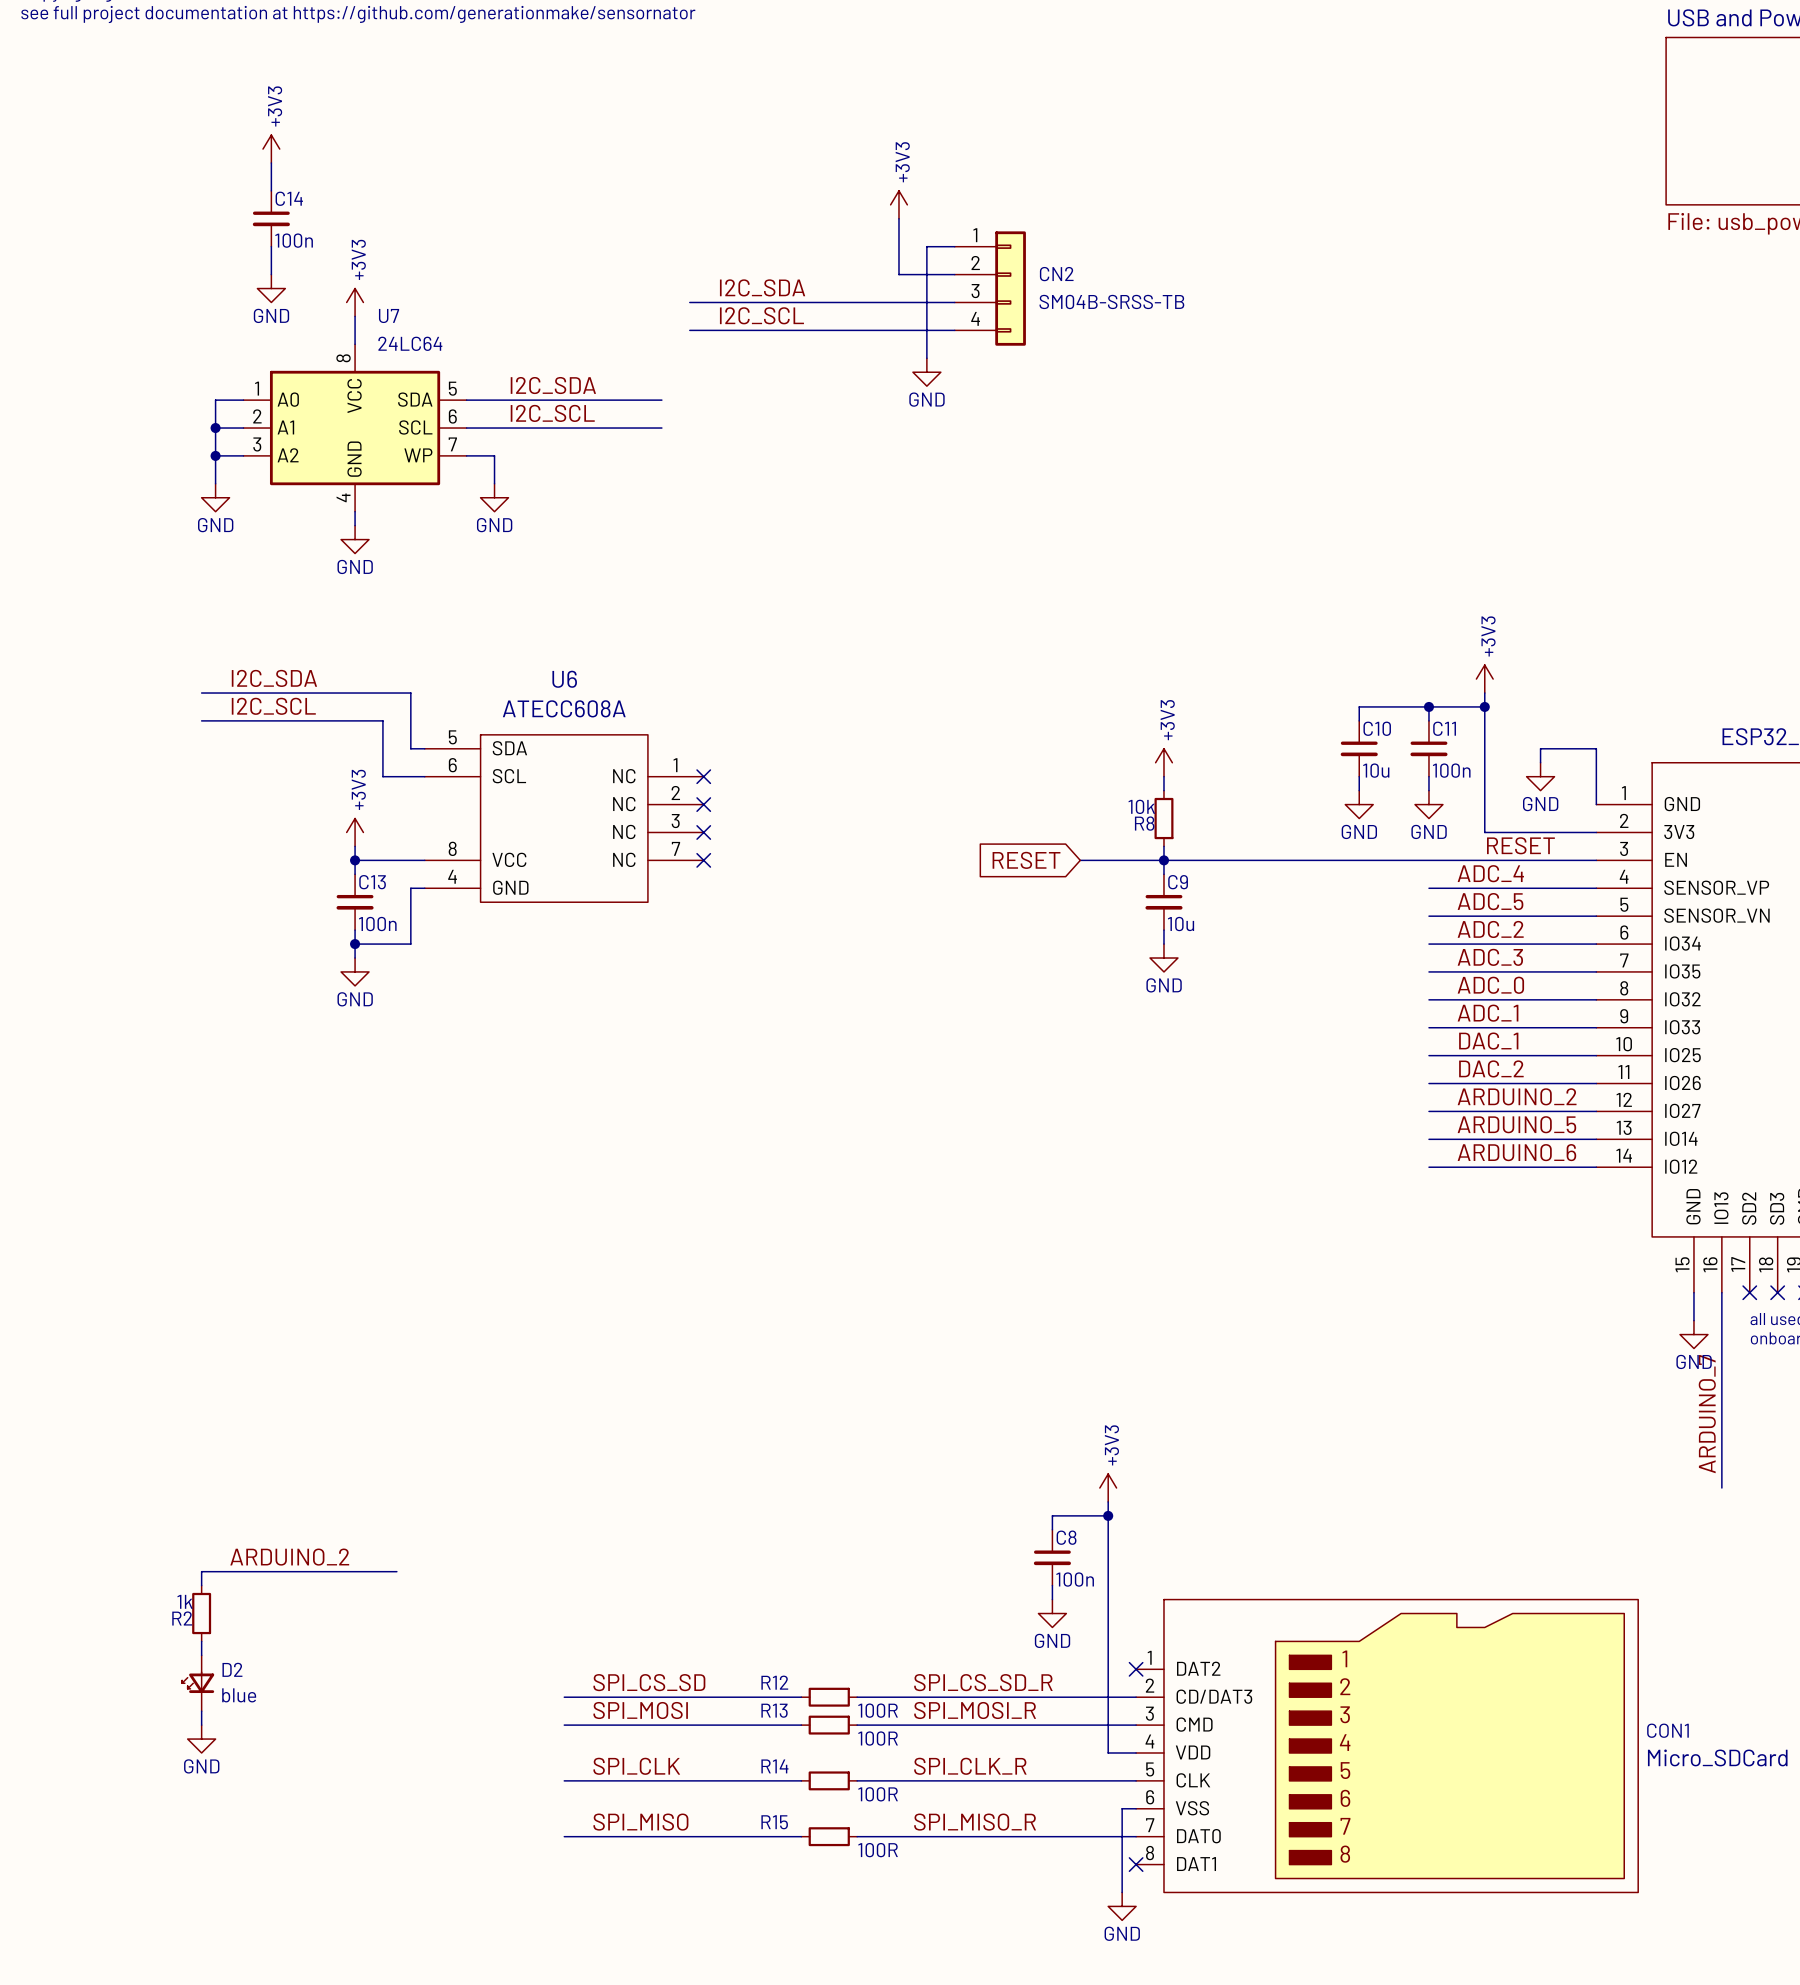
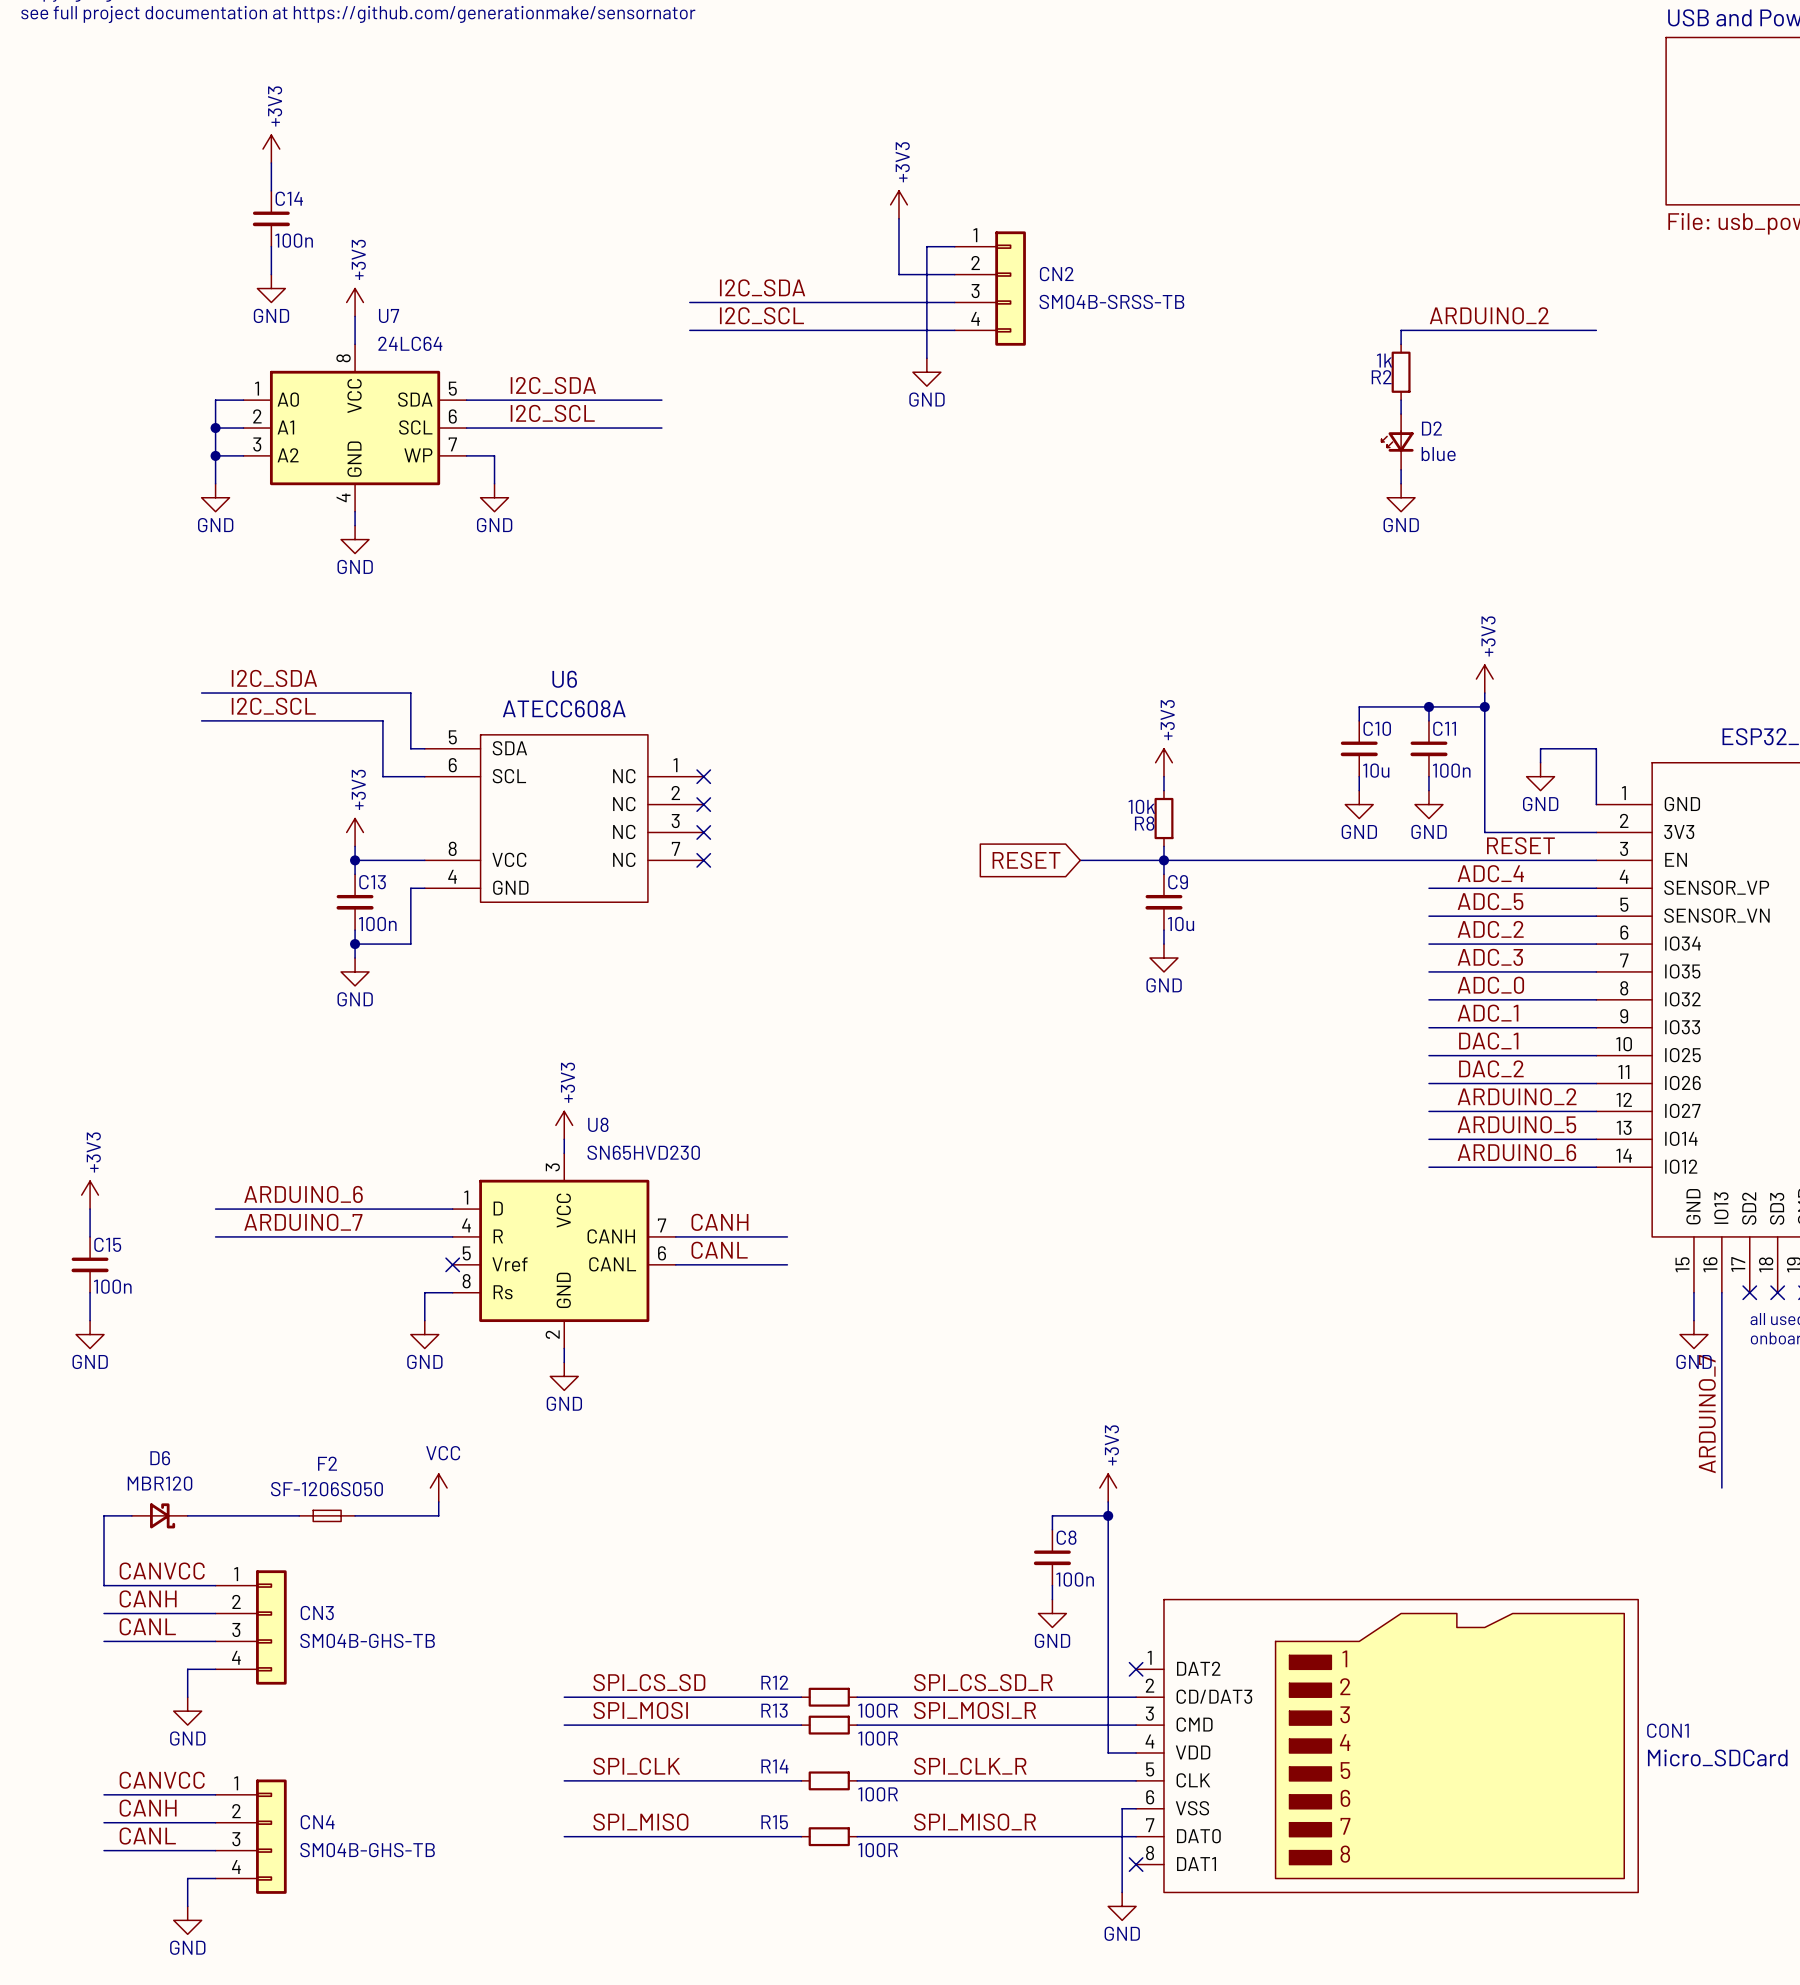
label: none -> ARDUINO_2 (1489, 315)
wire: none -> (1596, 330) (1401, 330) (1401, 344)
wire: none -> (1401, 400) (1401, 414)
wire: none -> (1401, 469) (1401, 483)
power symbol: none -> GND (1401, 497)
power symbol: none -> +3V3 (564, 1125)
wire: none -> (564, 1139) (564, 1153)
label: none -> ARDUINO_6 (303, 1194)
power symbol: none -> +3V3 (90, 1195)
wire: none -> (90, 1209) (90, 1236)
wire: none -> (215, 1209) (452, 1209)
label: none -> ARDUINO_7 (303, 1222)
label: none -> CANH (719, 1222)
wire: none -> (215, 1236) (452, 1236)
wire: none -> (675, 1236) (787, 1236)
U8: none -> SN65HVD230 (564, 1250)
label: none -> CANL (719, 1250)
C15: none -> 100n (90, 1264)
no-connect mark: none -> (452, 1264)
wire: none -> (675, 1264) (787, 1264)
wire: none -> (90, 1292) (90, 1320)
wire: none -> (452, 1292) (424, 1292) (424, 1320)
power symbol: none -> GND (90, 1334)
power symbol: none -> GND (424, 1334)
wire: none -> (564, 1348) (564, 1362)
power symbol: none -> GND (564, 1376)
power symbol: none -> VCC (438, 1488)
wire: none -> (438, 1501) (438, 1515) (355, 1515)
wire: none -> (131, 1515) (104, 1515) (104, 1585) (215, 1585)
D6: none -> MBR120 (159, 1515)
wire: none -> (187, 1515) (299, 1515)
F2: none -> SF-1206S050 (327, 1515)
label: ARDUINO_2 (289, 1557) -> none
label: none -> CANVCC (162, 1571)
wire: (396, 1571) (201, 1571) (201, 1585) -> none
label: none -> CANH (148, 1598)
wire: none -> (104, 1613) (215, 1613)
R2 position: (201, 1613) -> (1401, 372)
label: none -> CANL (147, 1626)
CN3: none -> SM04B-GHS-TB (251, 1627)
wire: none -> (104, 1641) (215, 1641)
wire: (201, 1641) (201, 1655) -> none
wire: none -> (215, 1669) (187, 1669) (187, 1697)
D2 position: (198, 1683) -> (1397, 441)
wire: (201, 1711) (201, 1725) -> none
power symbol position: GND (201, 1739) -> GND (187, 1711)
label: none -> CANVCC (162, 1780)
wire: none -> (104, 1794) (215, 1794)
label: none -> CANH (148, 1808)
wire: none -> (104, 1822) (215, 1822)
label: none -> CANL (147, 1836)
CN4: none -> SM04B-GHS-TB (251, 1836)
wire: none -> (104, 1850) (215, 1850)
wire: none -> (215, 1878) (187, 1878) (187, 1906)
power symbol: none -> GND (187, 1920)

